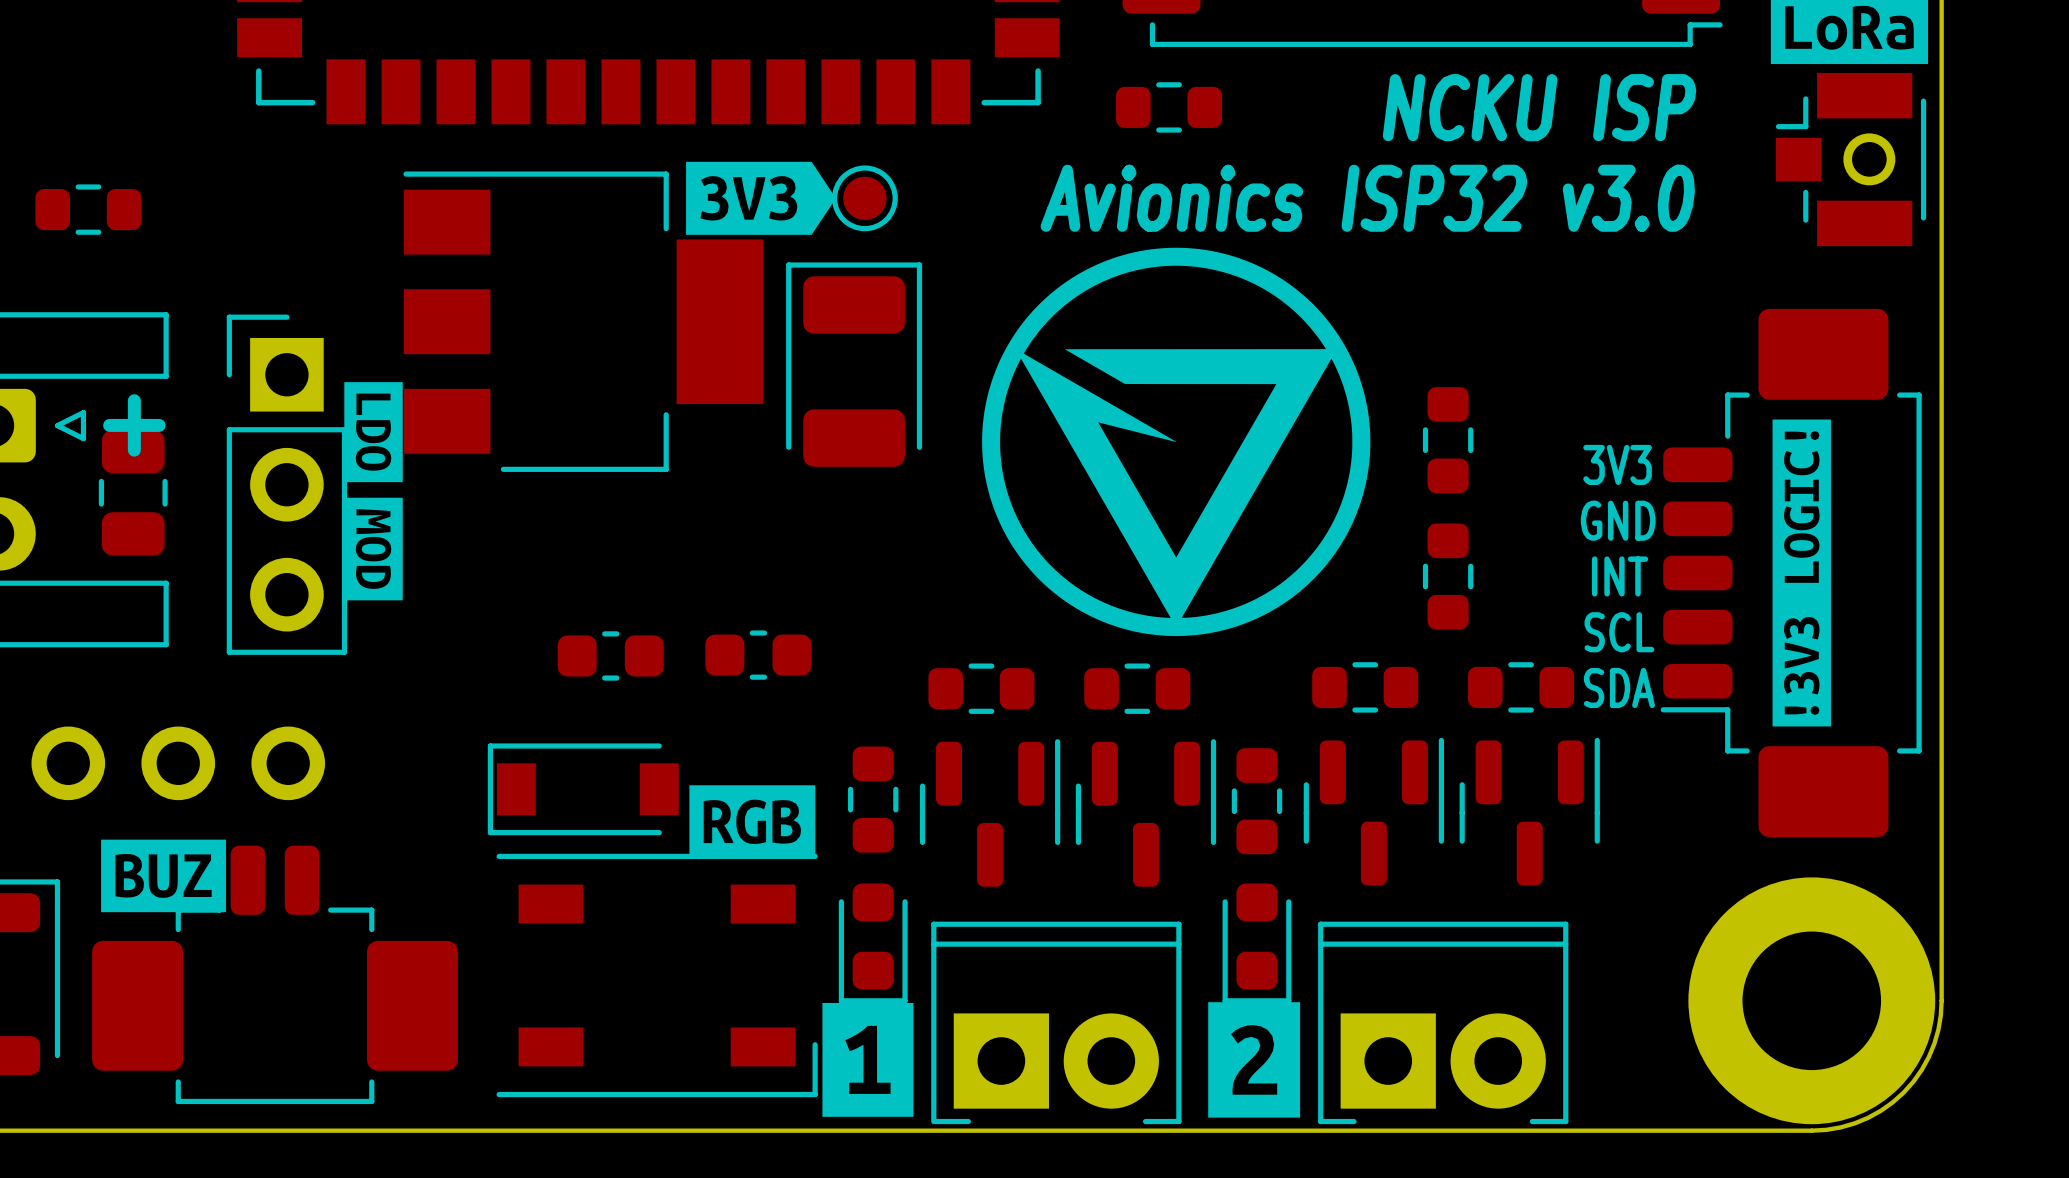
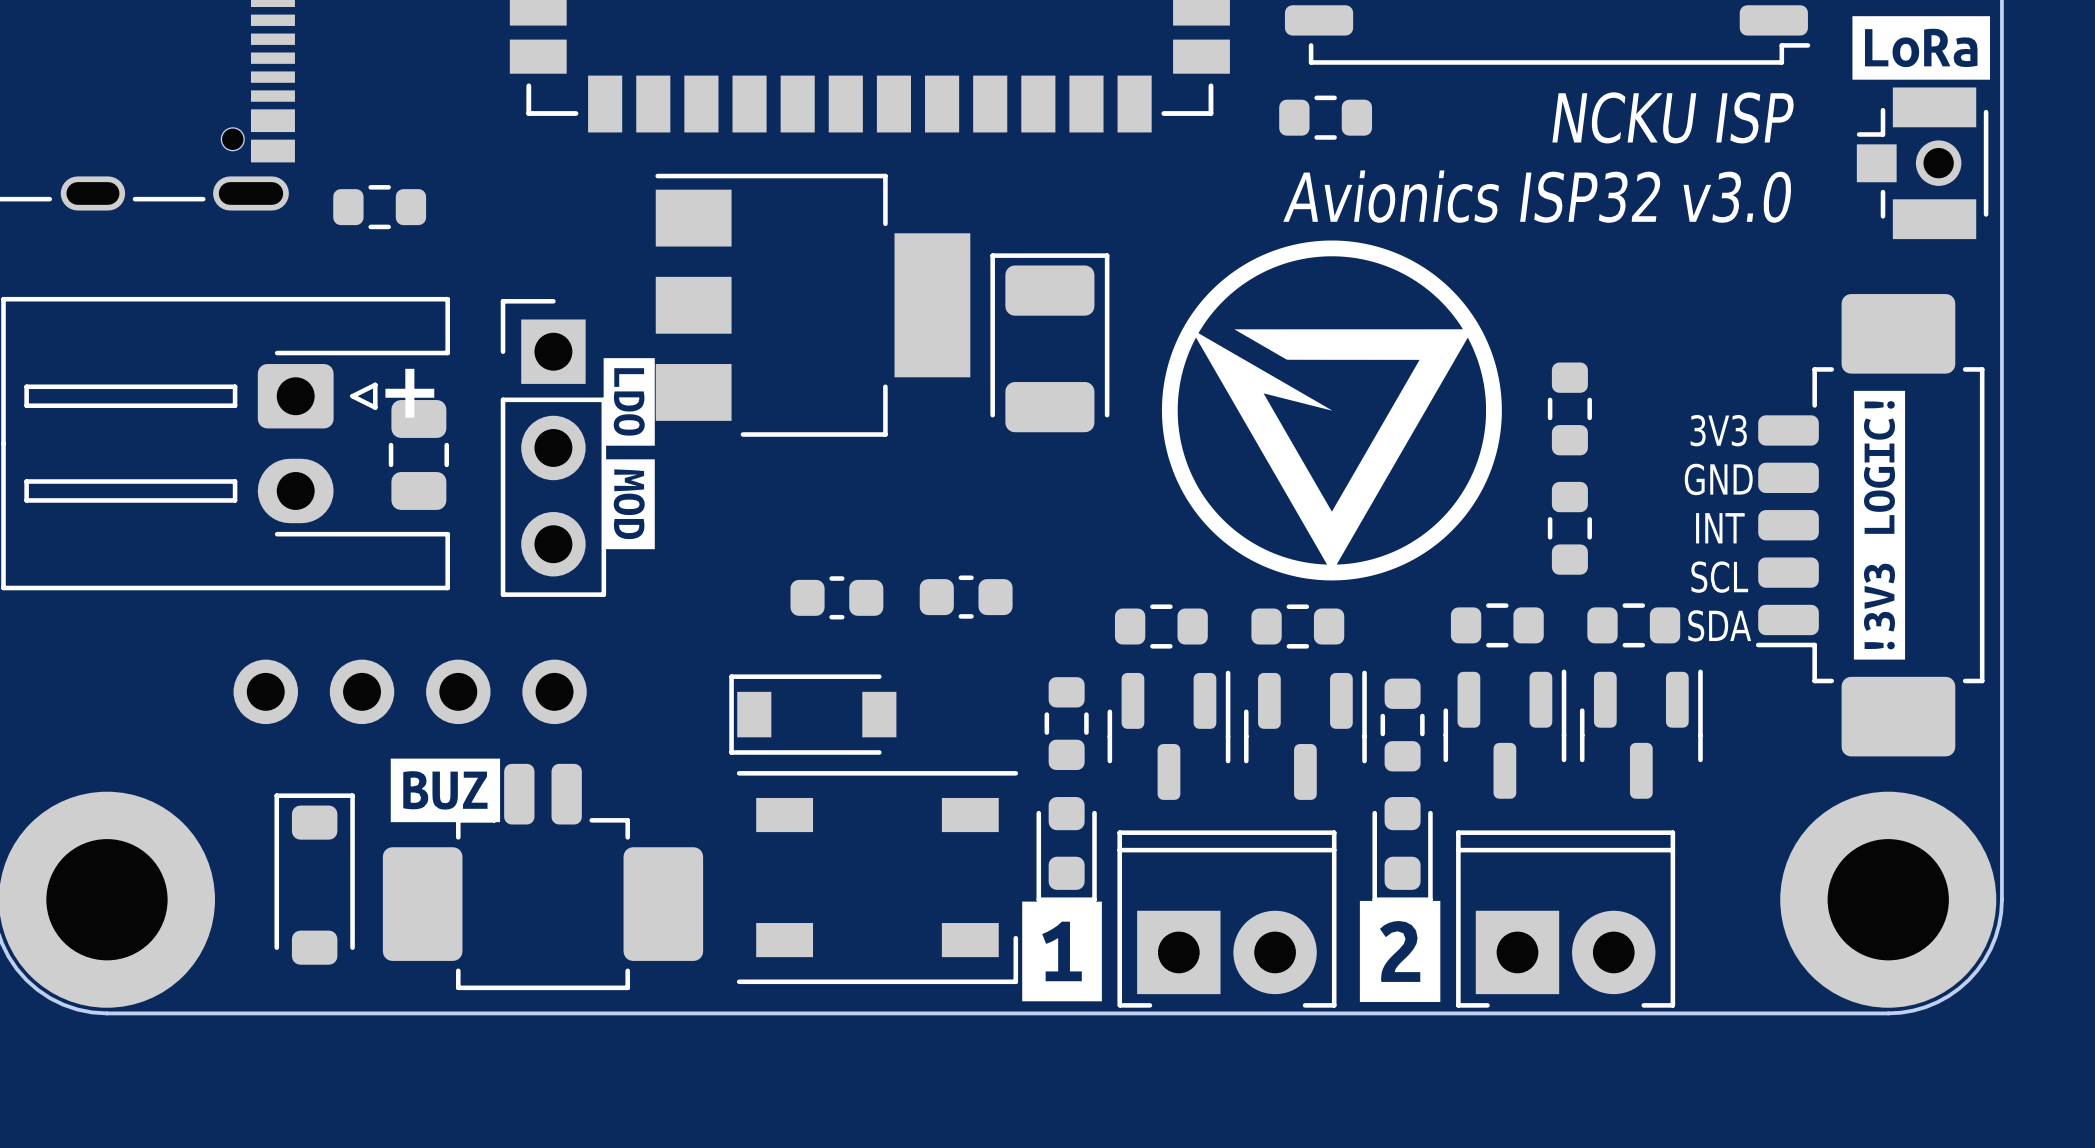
drawing: [686, 161, 836, 235] -> none
part: (864, 198) -> none
drawing: [689, 785, 816, 859] -> none

